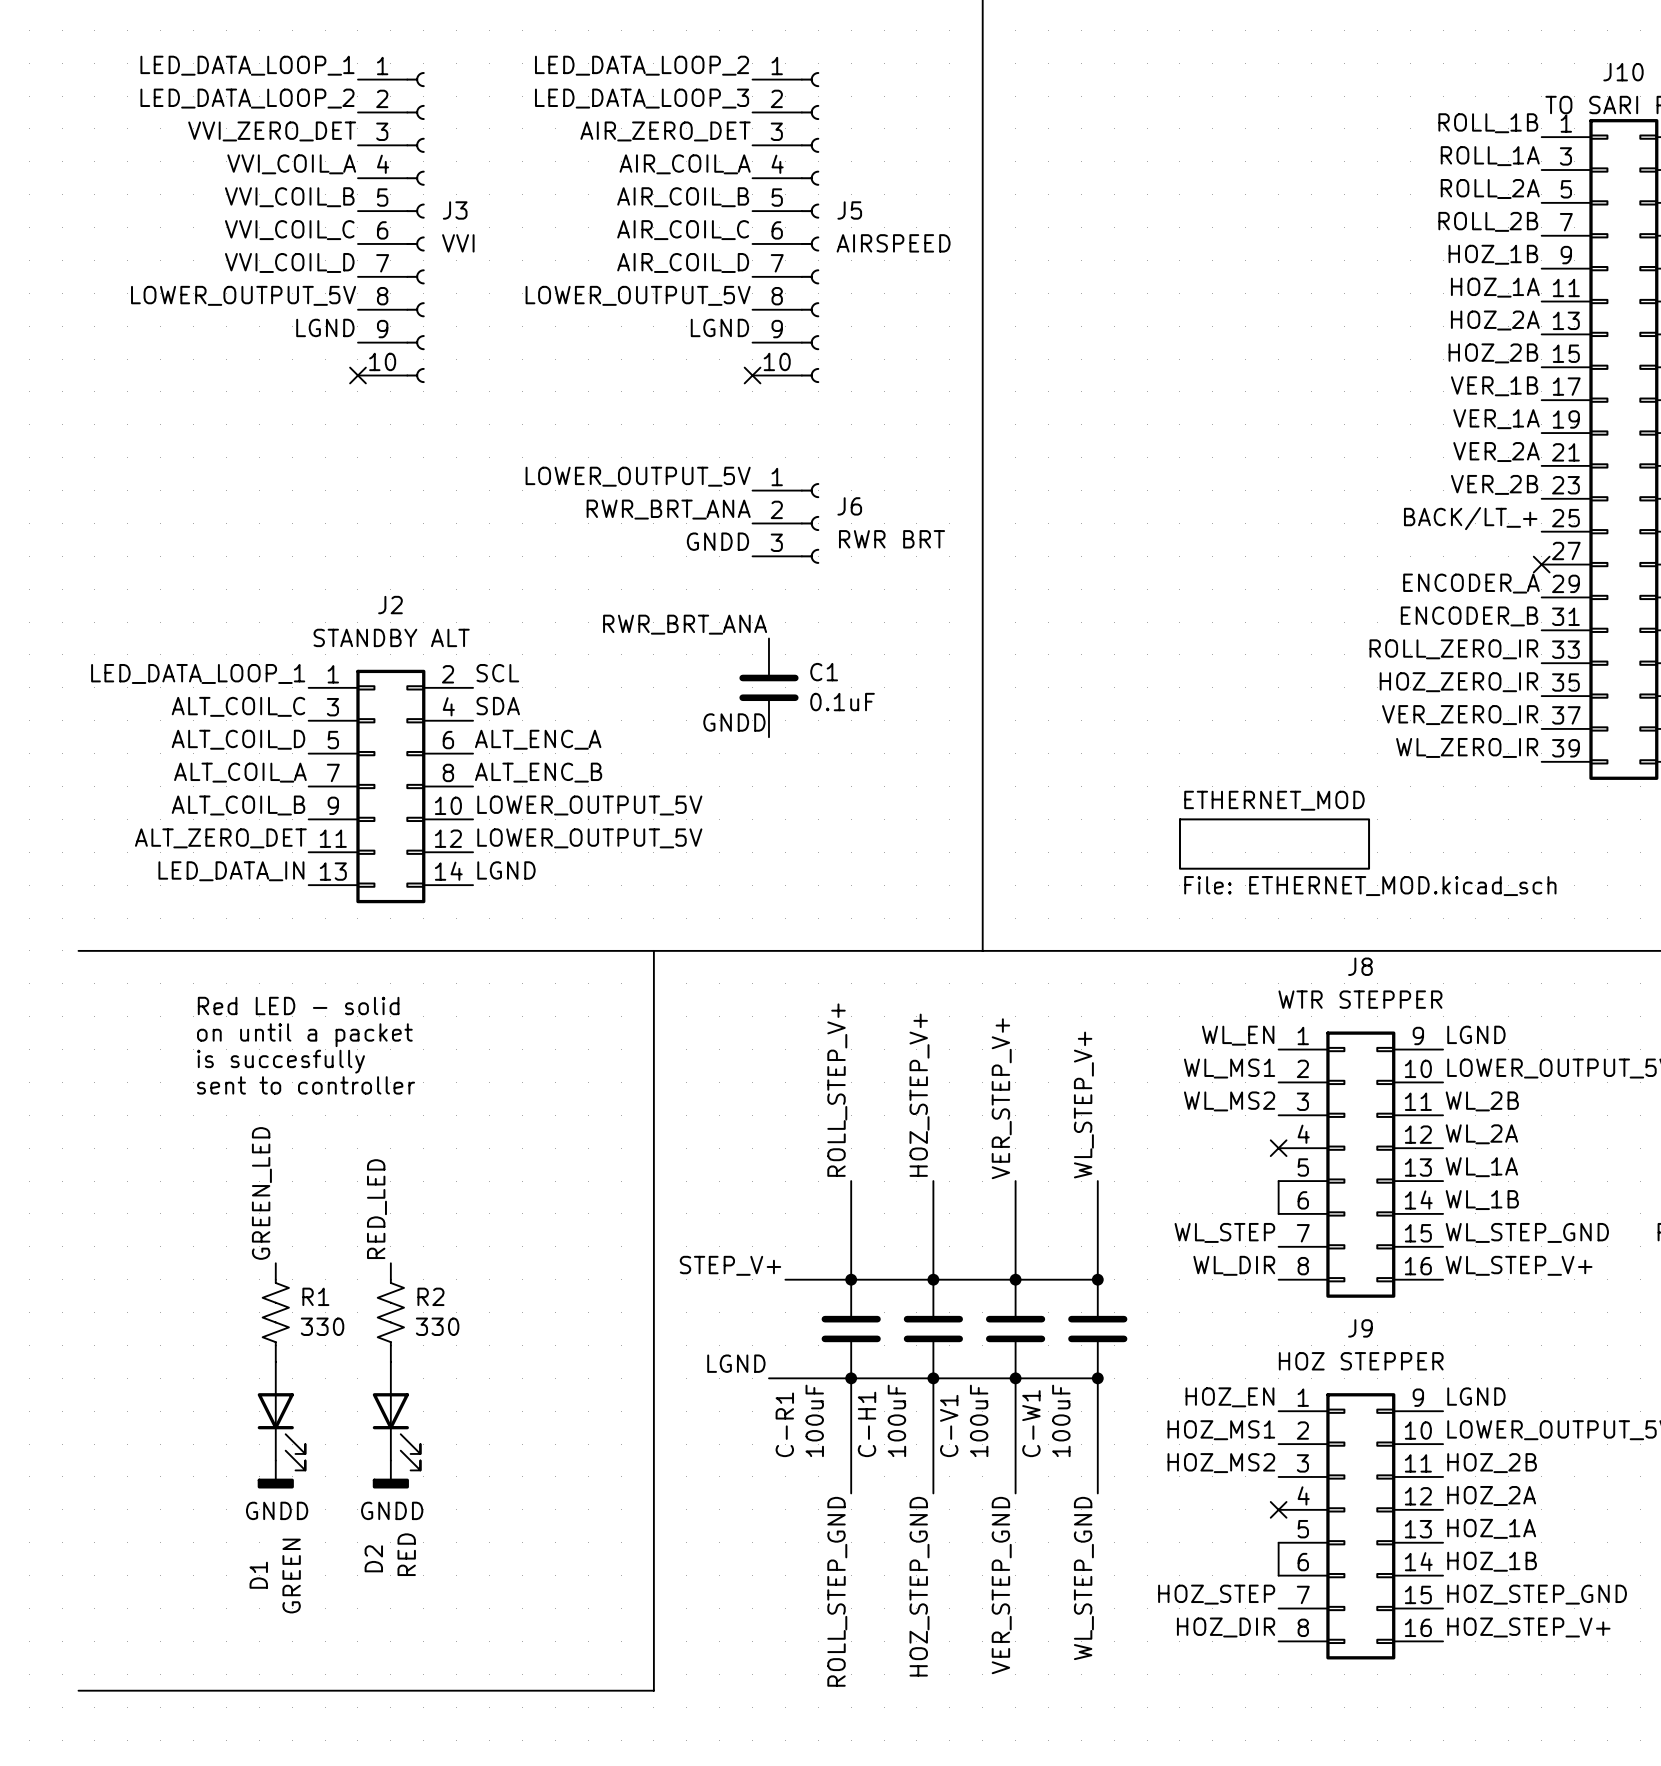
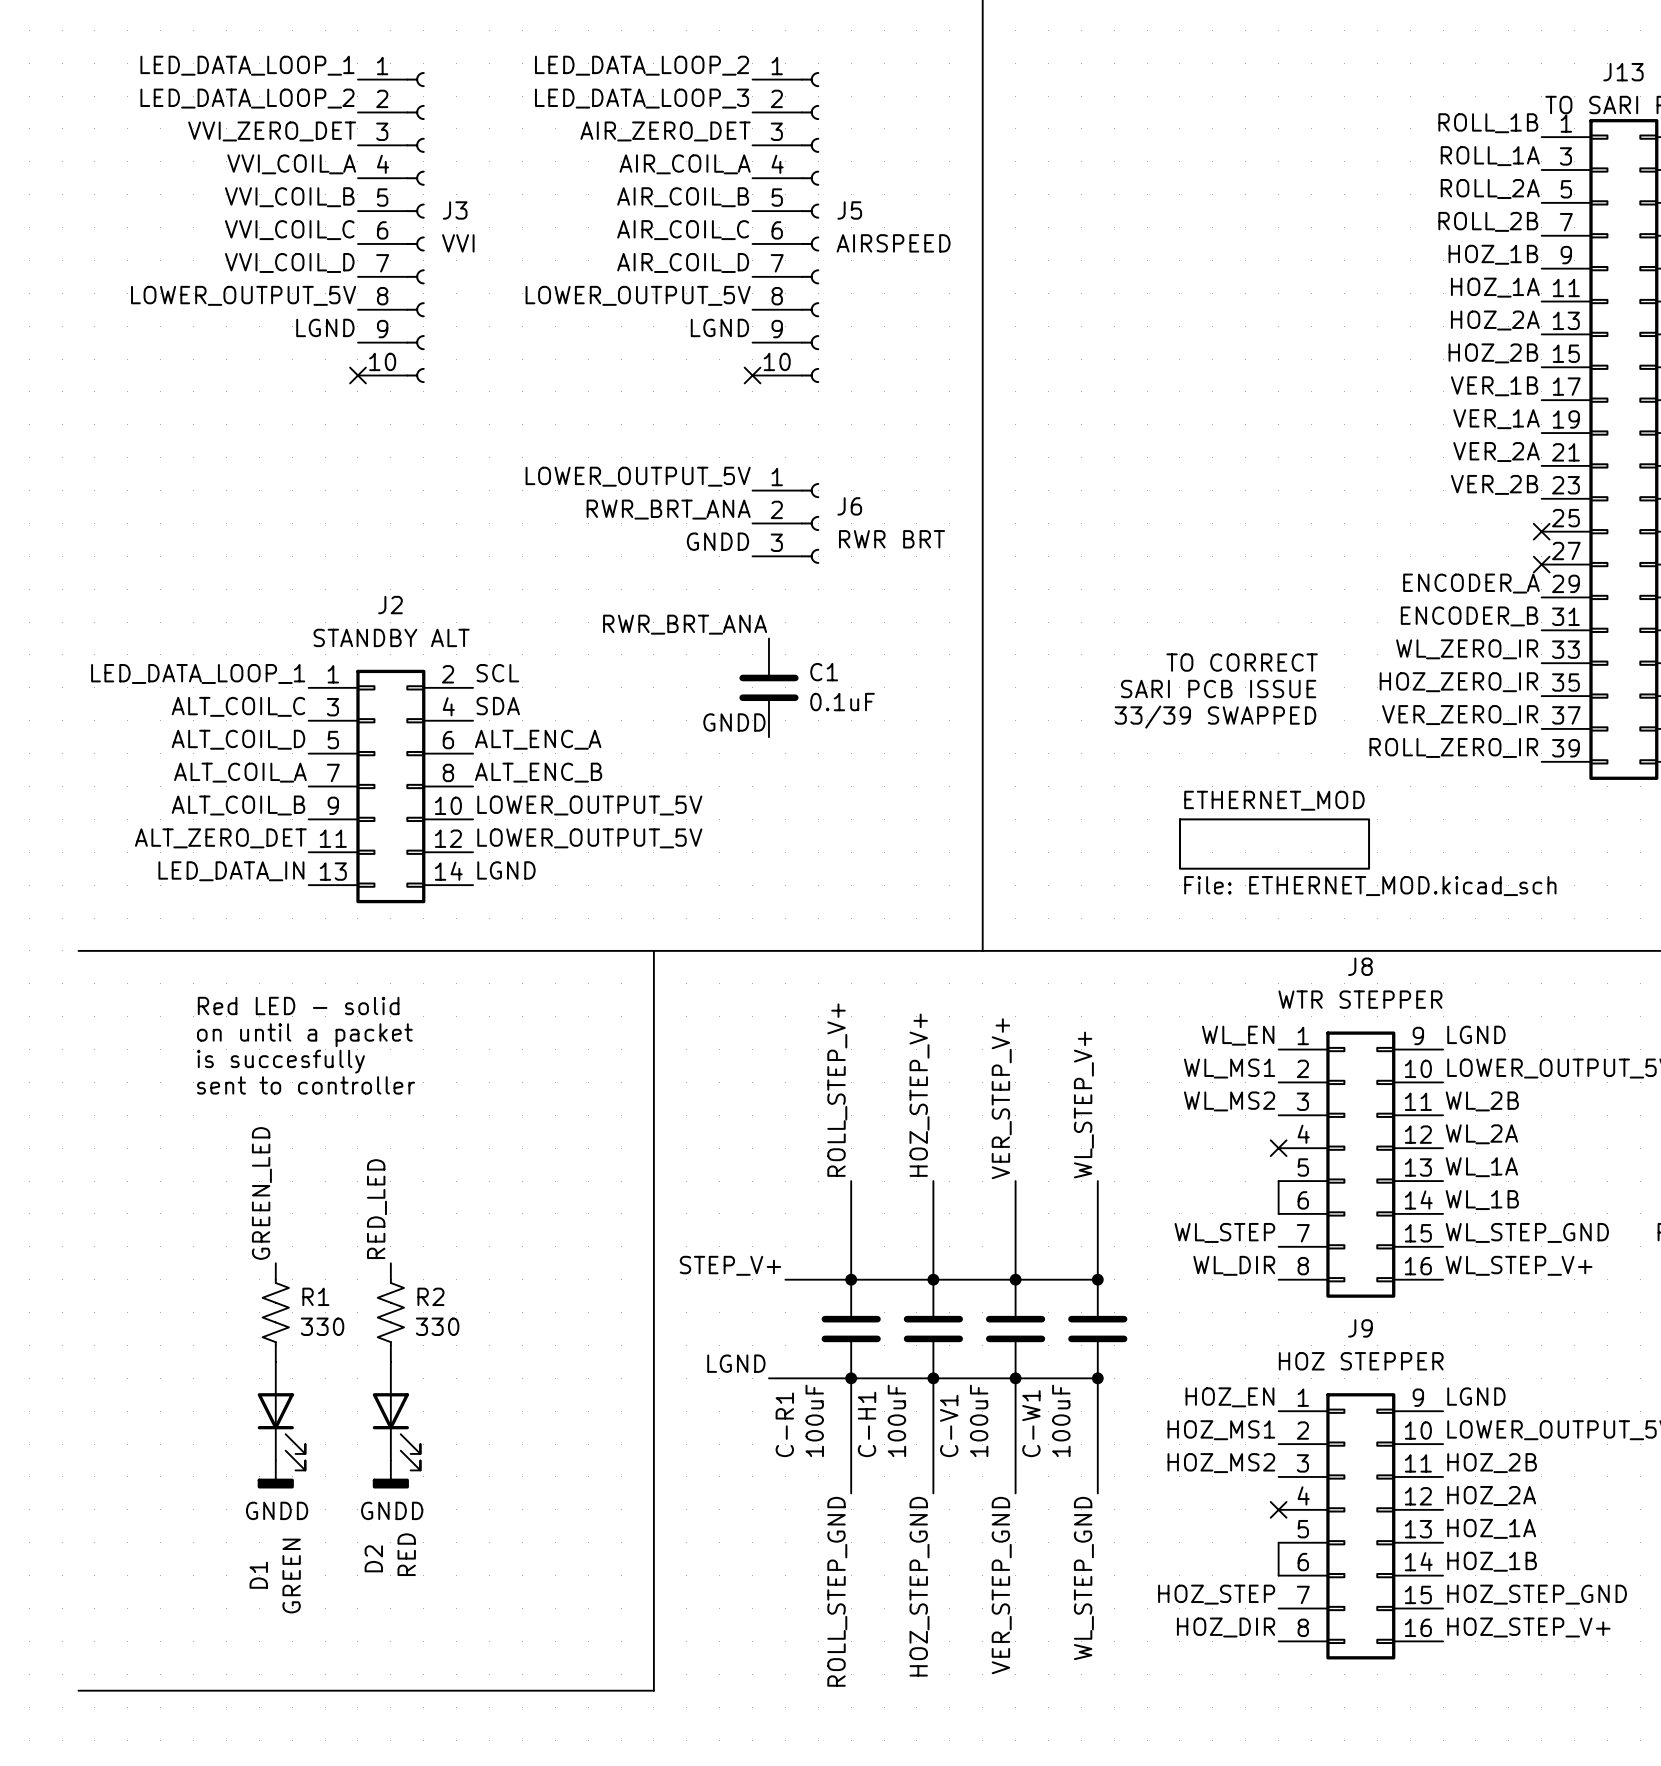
J10 name: J10 (1623, 72) -> J13 (1623, 72)
label: BACK/LT_+ (1470, 518) -> none
no-connect mark: none -> (1541, 531)
label: ROLL_ZERO_IR (1453, 649) -> WL_ZERO_IR (1467, 649)
text: none -> TO CORRECT (1242, 662)
text: none -> SARI PCB ISSUE (1218, 689)
text: none -> 33/39 SWAPPED (1215, 717)
label: WL_ZERO_IR (1467, 747) -> ROLL_ZERO_IR (1453, 747)

